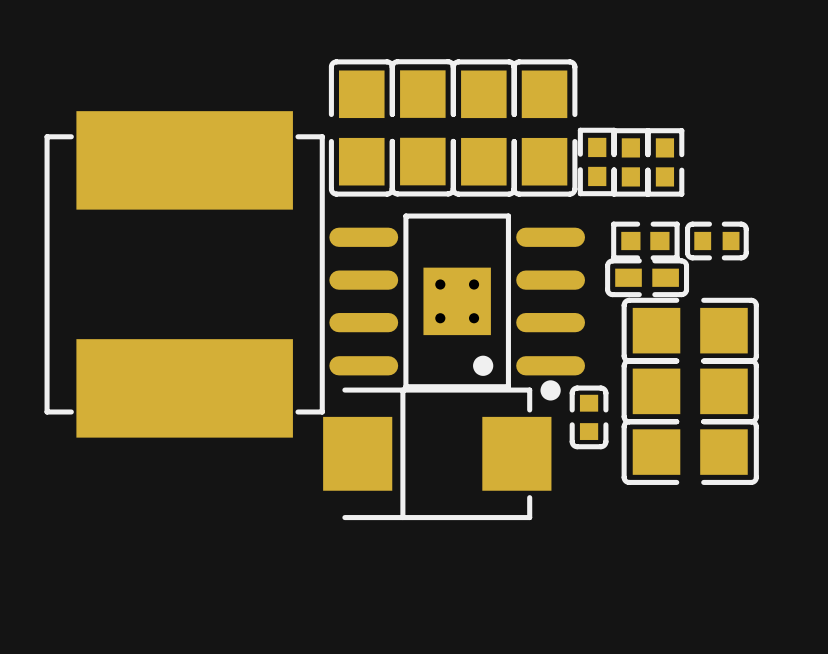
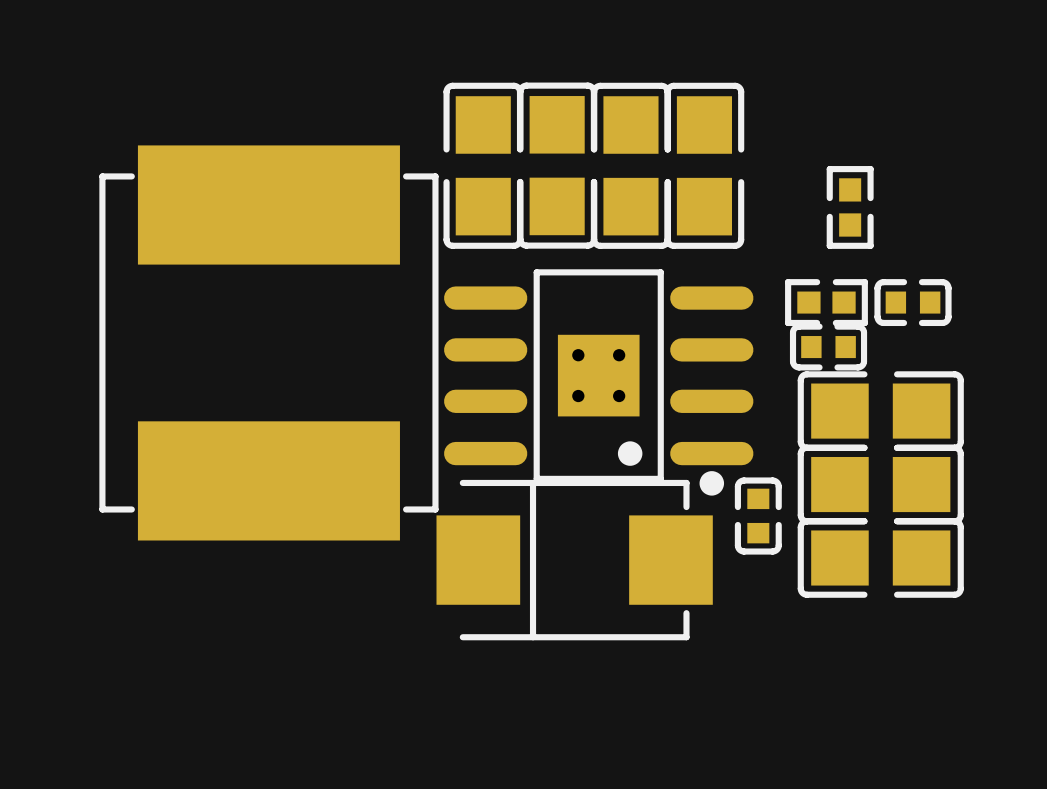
part: (597, 161) -> none
part: (630, 162) -> none
part footprint: [605, 258, 690, 298] -> [789, 323, 868, 371]

